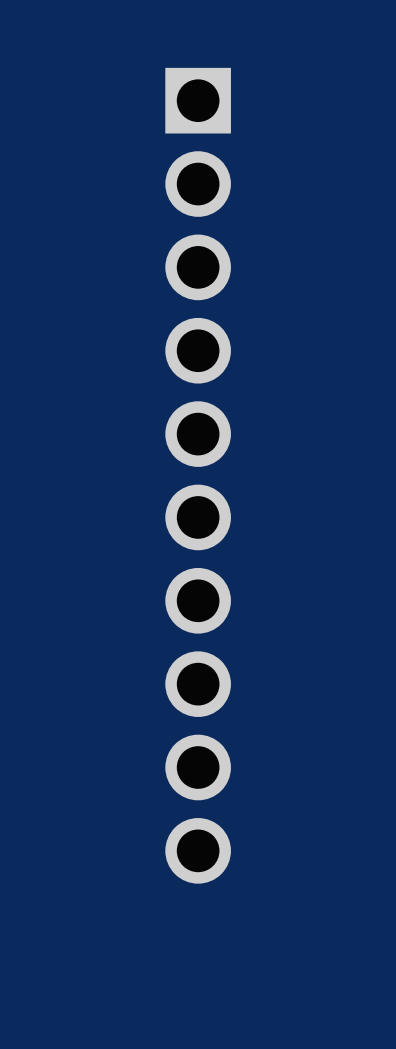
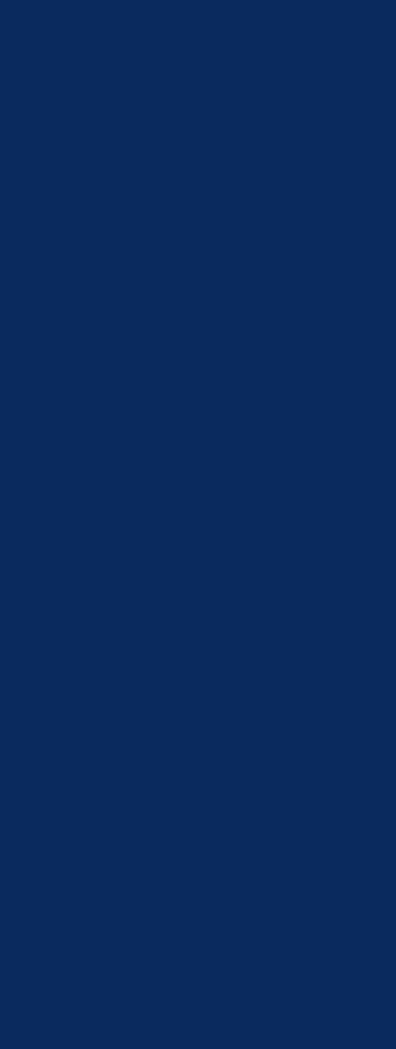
part: (198, 475) -> none

